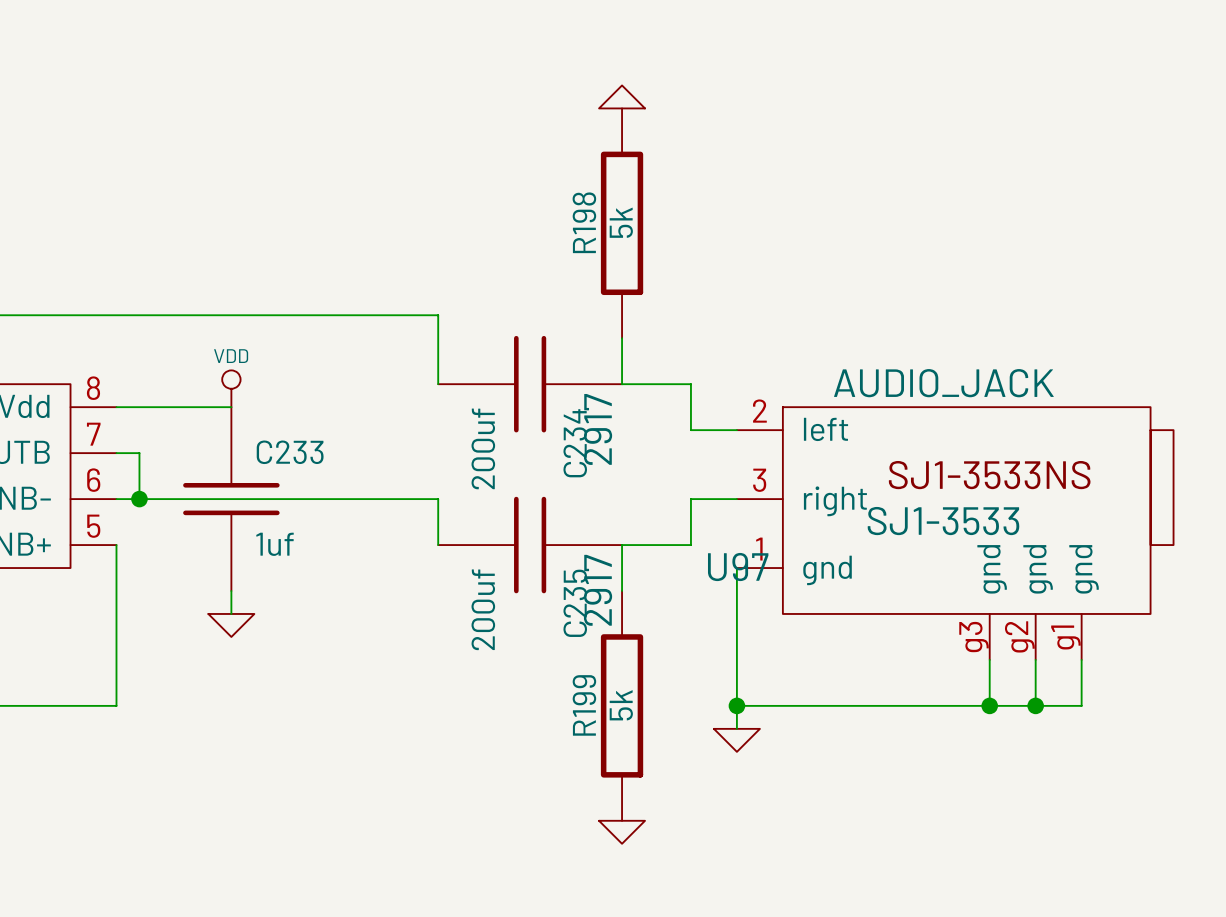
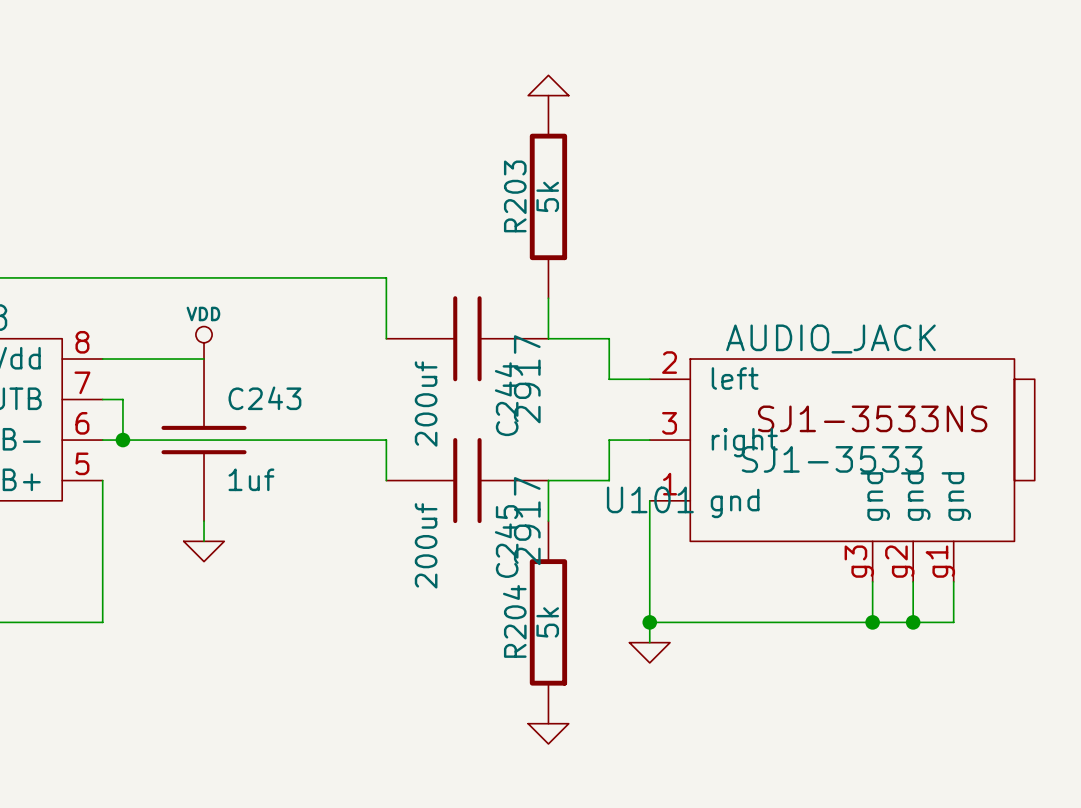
R198 name: R198 (584, 222) -> R203 (515, 196)
C234 name: C234 (575, 443) -> C244 (506, 399)
C233 name: C233 (290, 452) -> C243 (264, 398)
U97 name: U97 (738, 567) -> U101 (650, 499)
C235 name: C235 (575, 603) -> C245 (506, 541)
R199 name: R199 (584, 705) -> R204 (514, 621)

